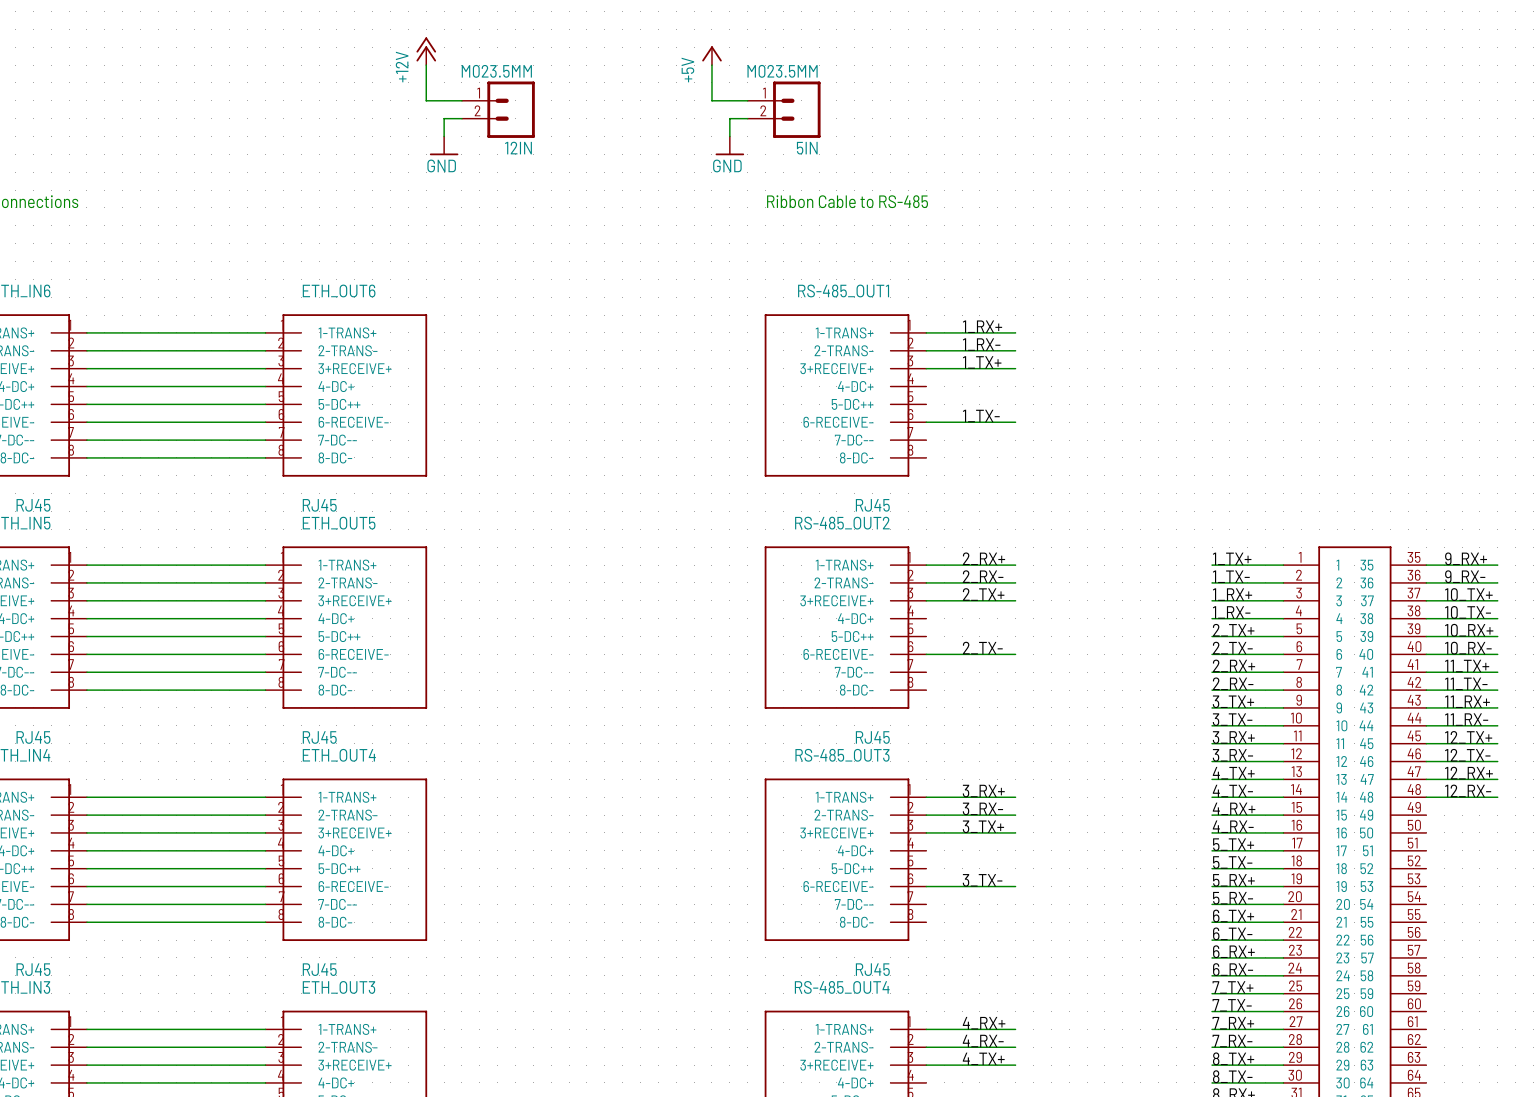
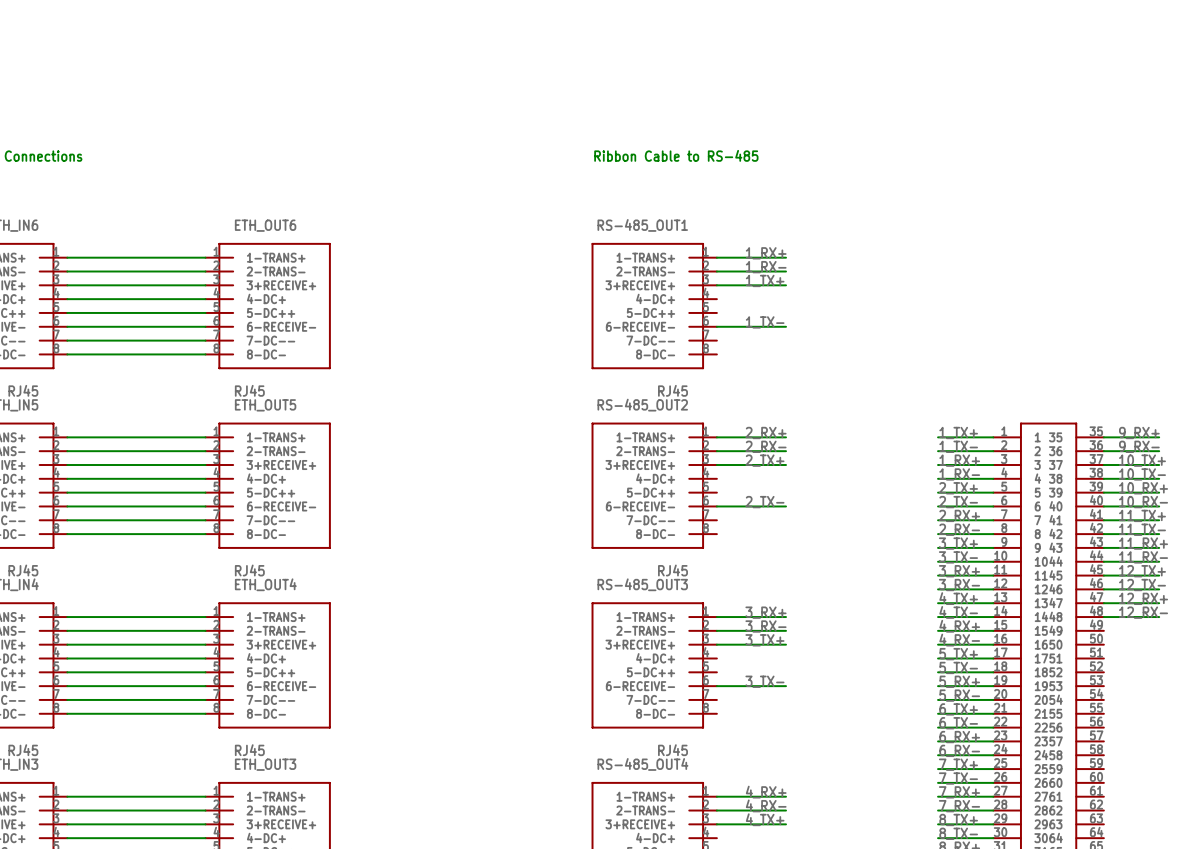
power symbol: +12V (426, 51) -> none
power symbol: +5V (711, 55) -> none
wire: (426, 65) (426, 100) (461, 100) -> none
wire: (711, 65) (711, 100) (747, 100) -> none
12IN: M023.5MM (498, 109) -> none
5IN: M023.5MM (784, 109) -> none
wire: (461, 118) (444, 118) (444, 136) -> none
wire: (747, 118) (729, 118) (729, 136) -> none
power symbol: GND (444, 145) -> none
power symbol: GND (729, 145) -> none

